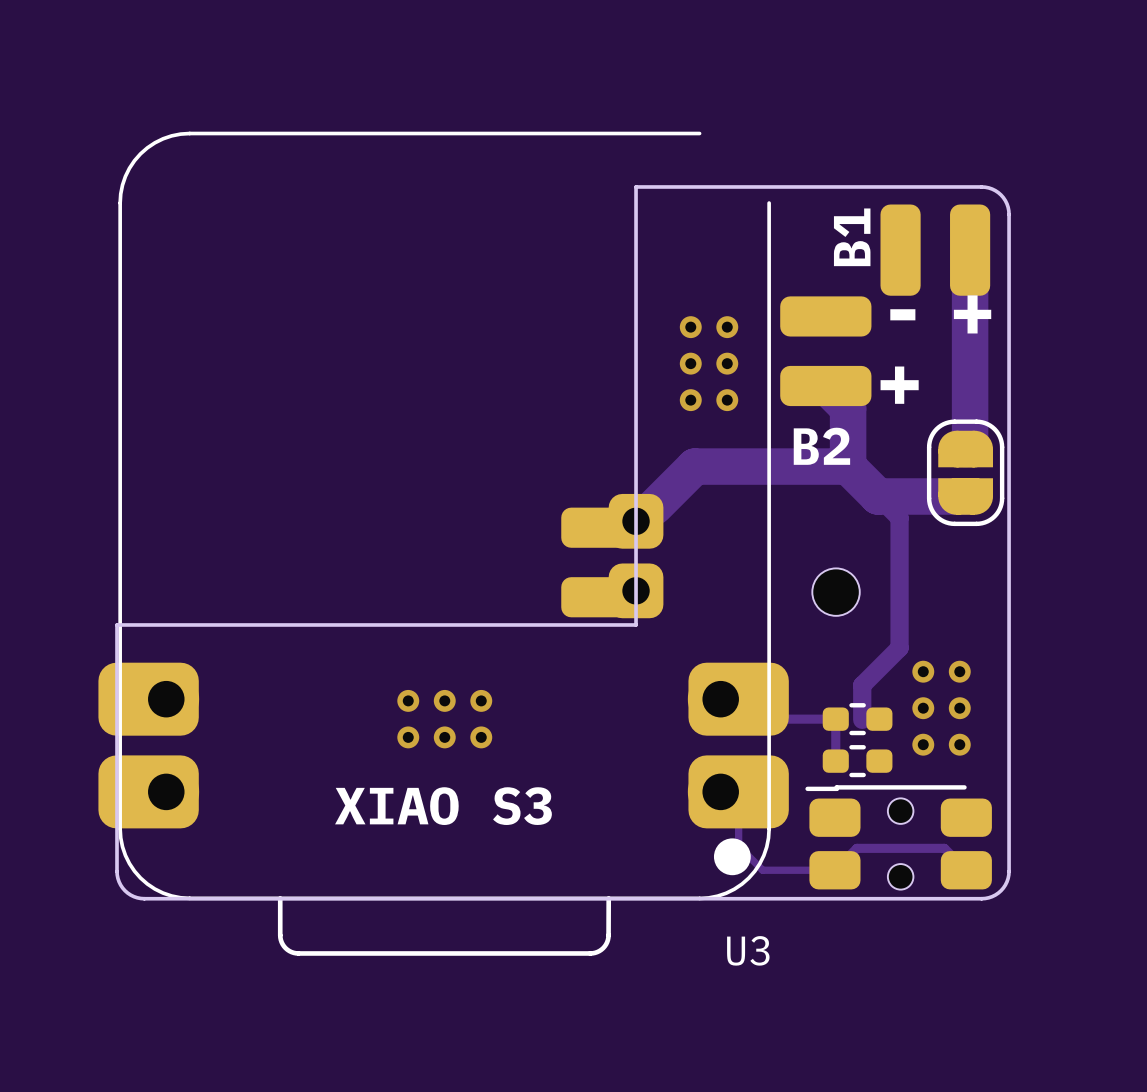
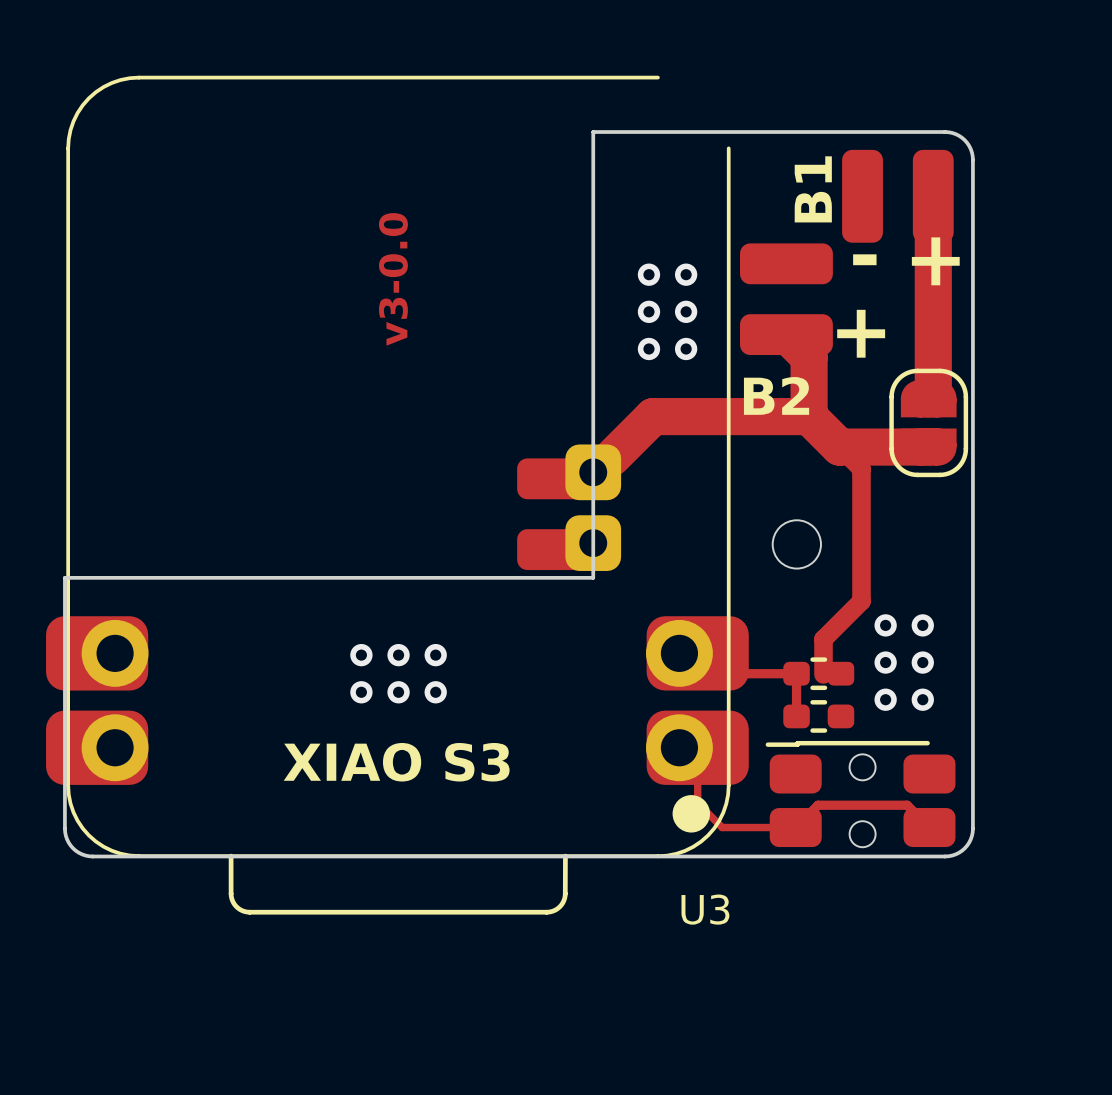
text: none -> v3-0.0 (393, 279)

